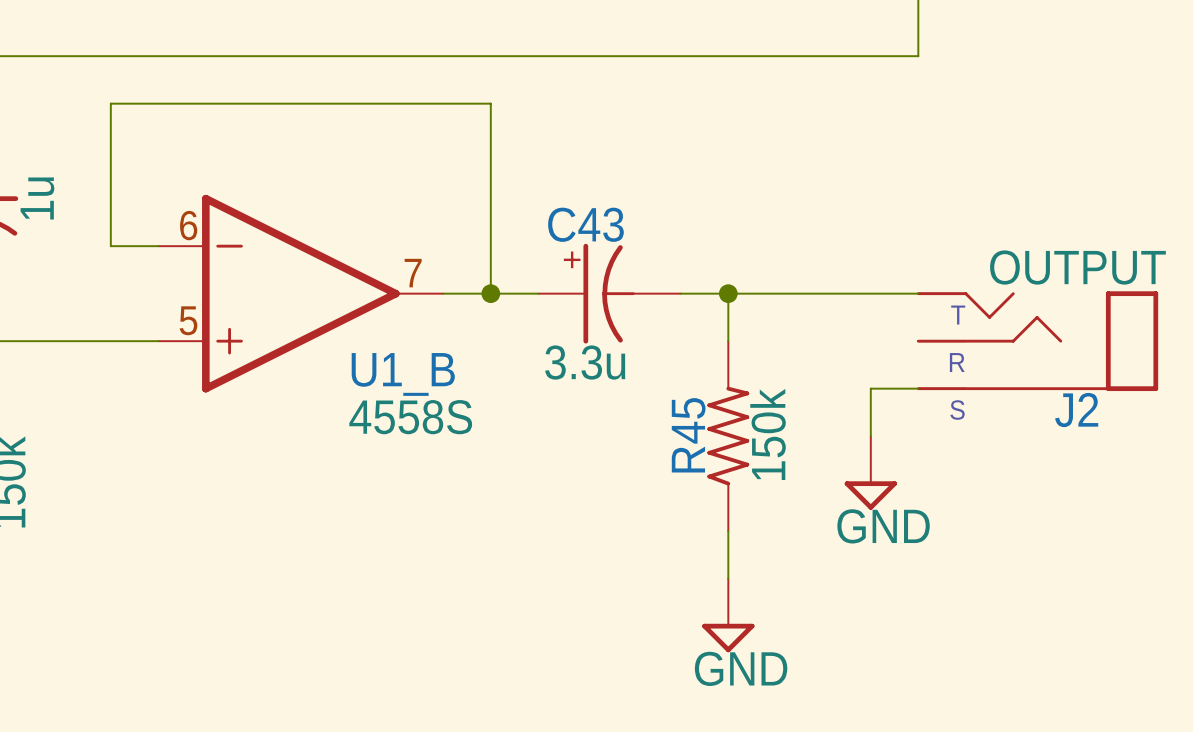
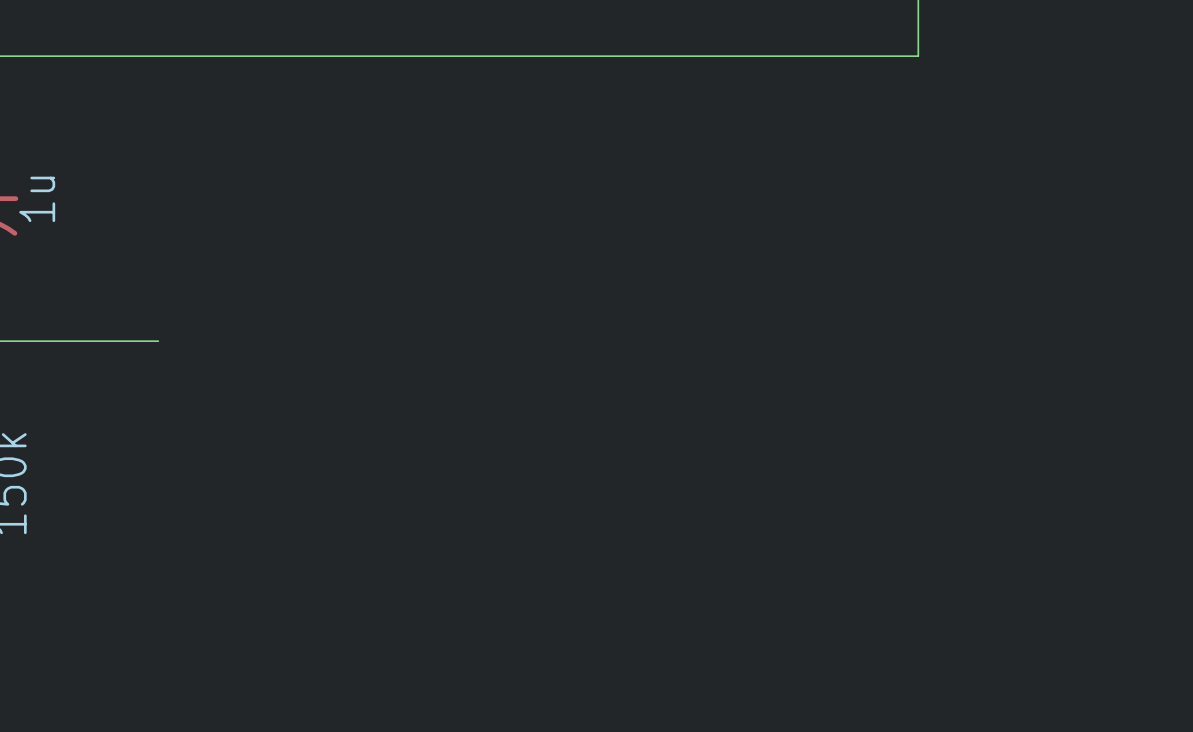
wire: (158, 246) (110, 246) (110, 103) (490, 103) (490, 293) -> none
U1_B: 4558S (300, 293) -> none
wire: (443, 293) (538, 293) -> none
junction: (490, 293) -> none
C43: 3.3u (609, 293) -> none
wire: (680, 293) (918, 293) -> none
wire: (728, 293) (728, 341) -> none
junction: (728, 293) -> none
J2: OUTPUT (1037, 341) -> none
wire: (918, 388) (870, 388) (870, 436) -> none
R45: 150k (728, 436) -> none
power symbol: GND (870, 472) -> none
wire: (728, 531) (728, 578) -> none
power symbol: GND (728, 615) -> none

